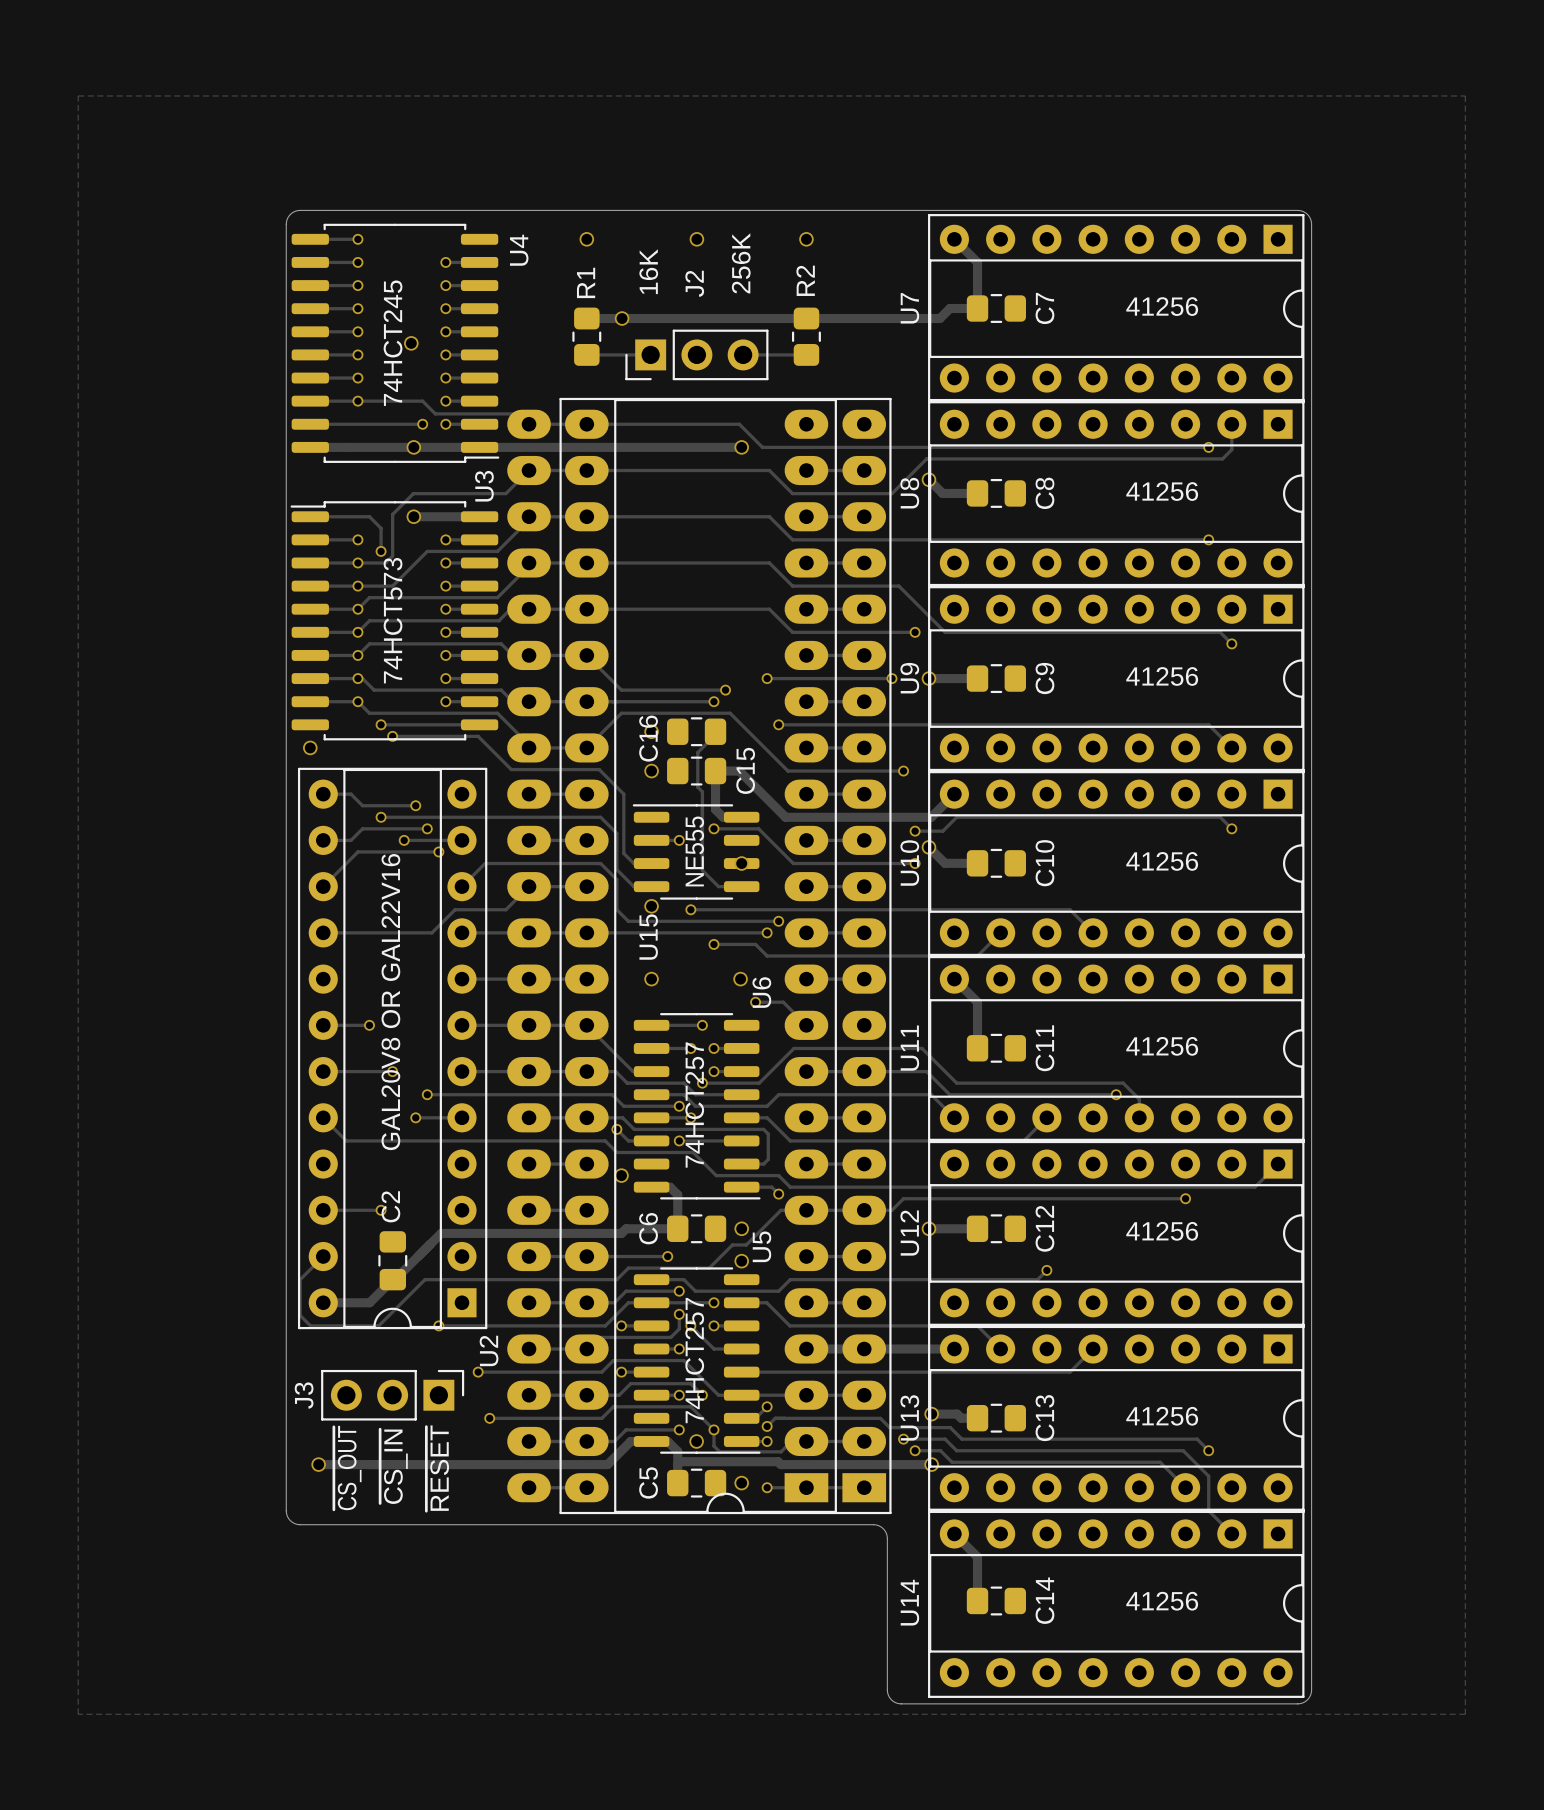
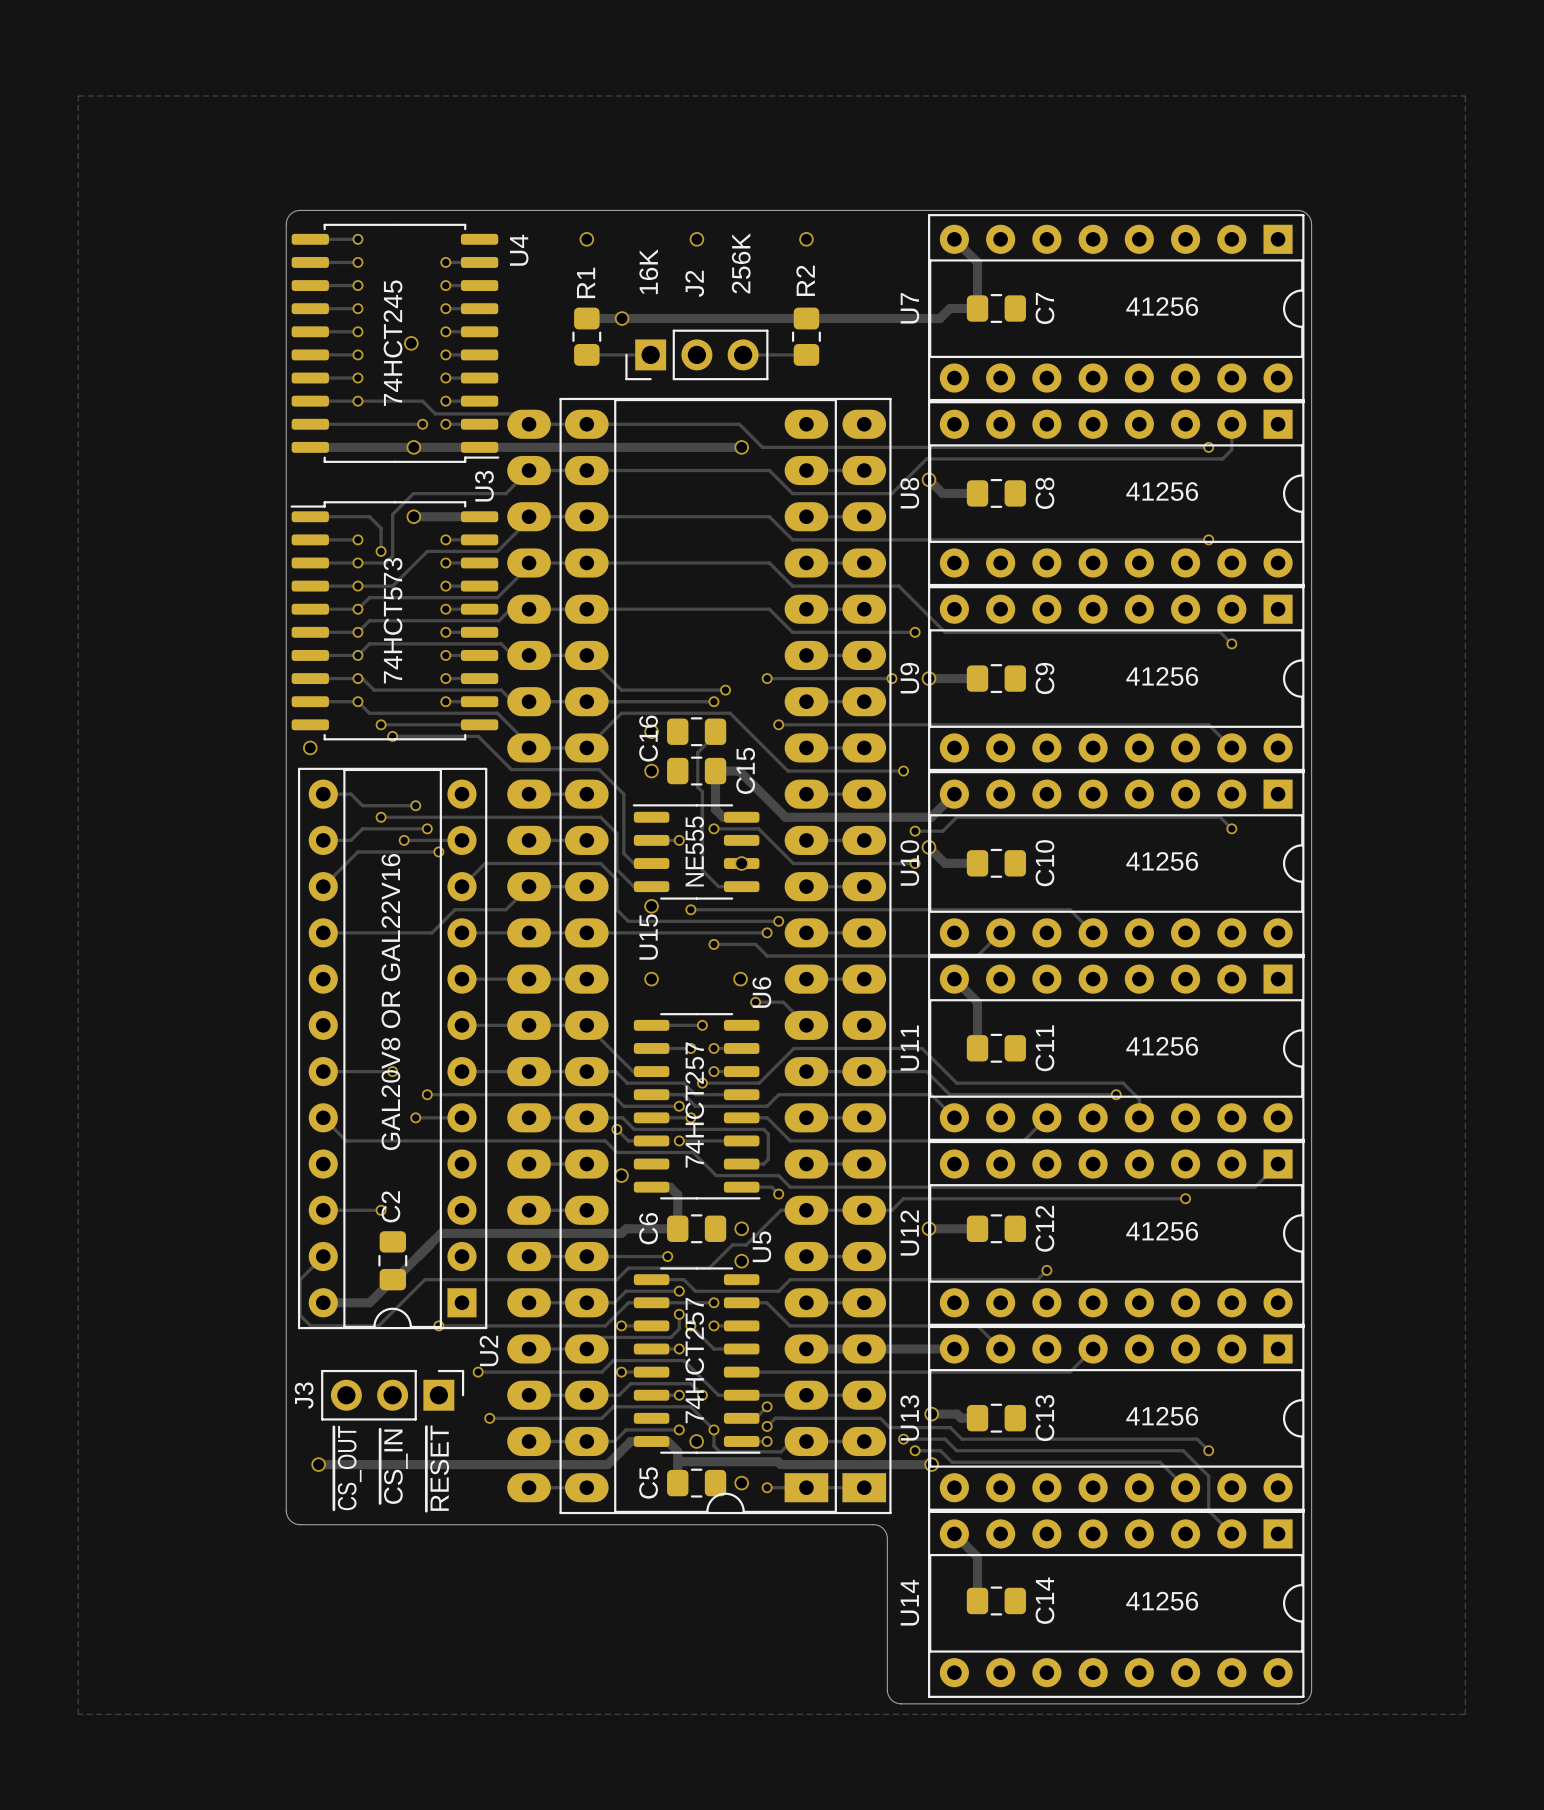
track: (323, 1025) (369, 1025) -> none
via: (369, 1025) -> none

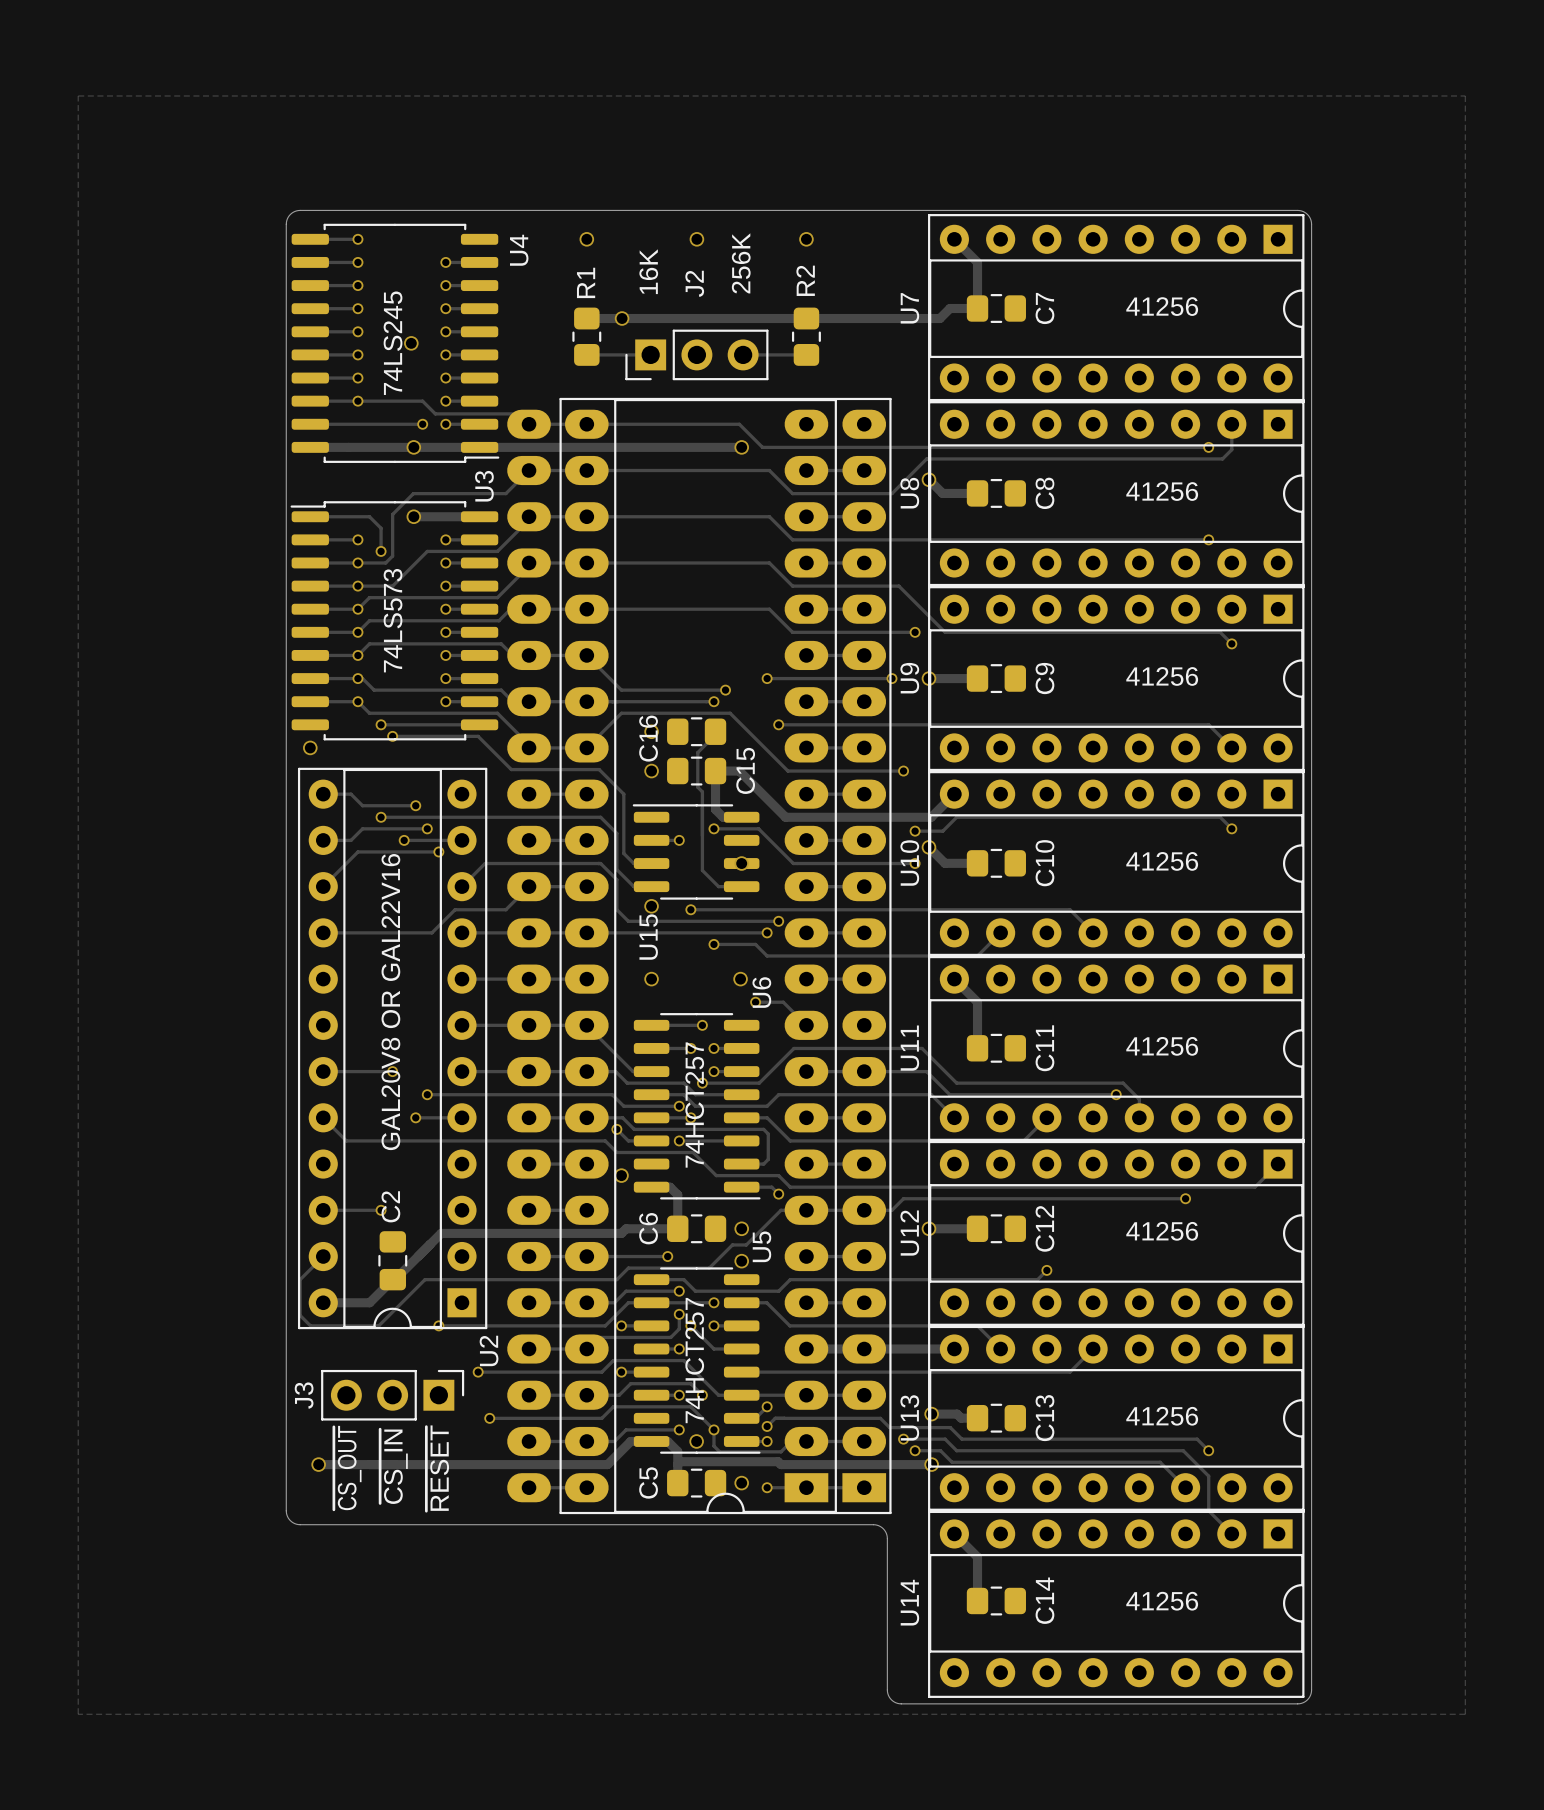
U4 value: 74HCT245 (393, 343) -> 74LS245 (393, 343)
U3 value: 74HCT573 (393, 620) -> 74LS573 (393, 620)
U15 value: NE555 (694, 851) -> none

